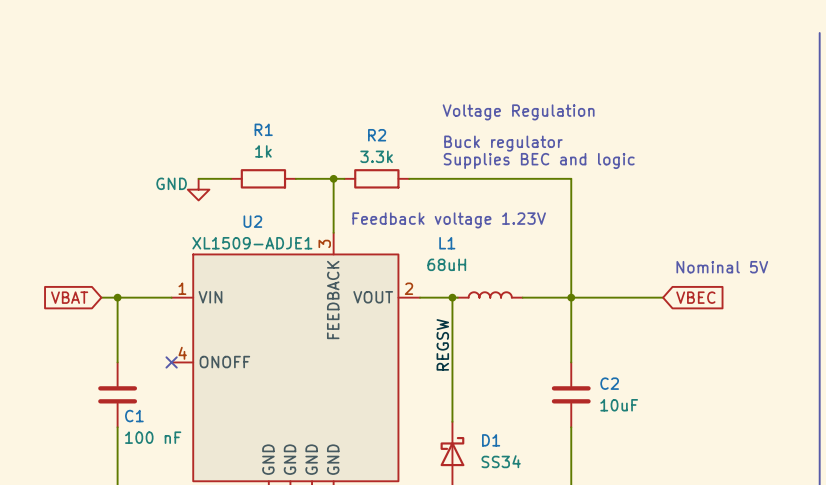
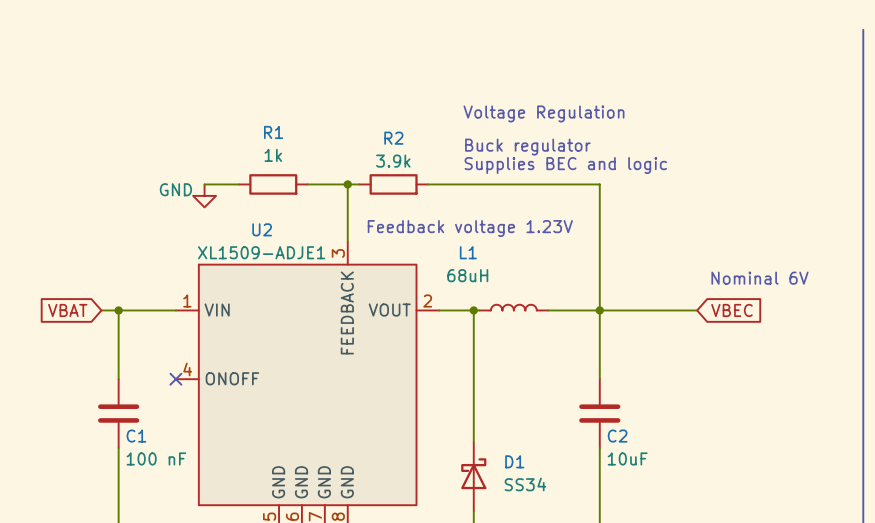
R2 value: 3.3k (376, 156) -> 3.9k (393, 161)
text: Nominal 5V (722, 267) -> Nominal 6V (759, 278)
label: REGSW (442, 344) -> none
C2 name position: C2 (609, 383) -> C2 (617, 436)
C2 value position: 10uF (619, 405) -> 10uF (627, 458)

